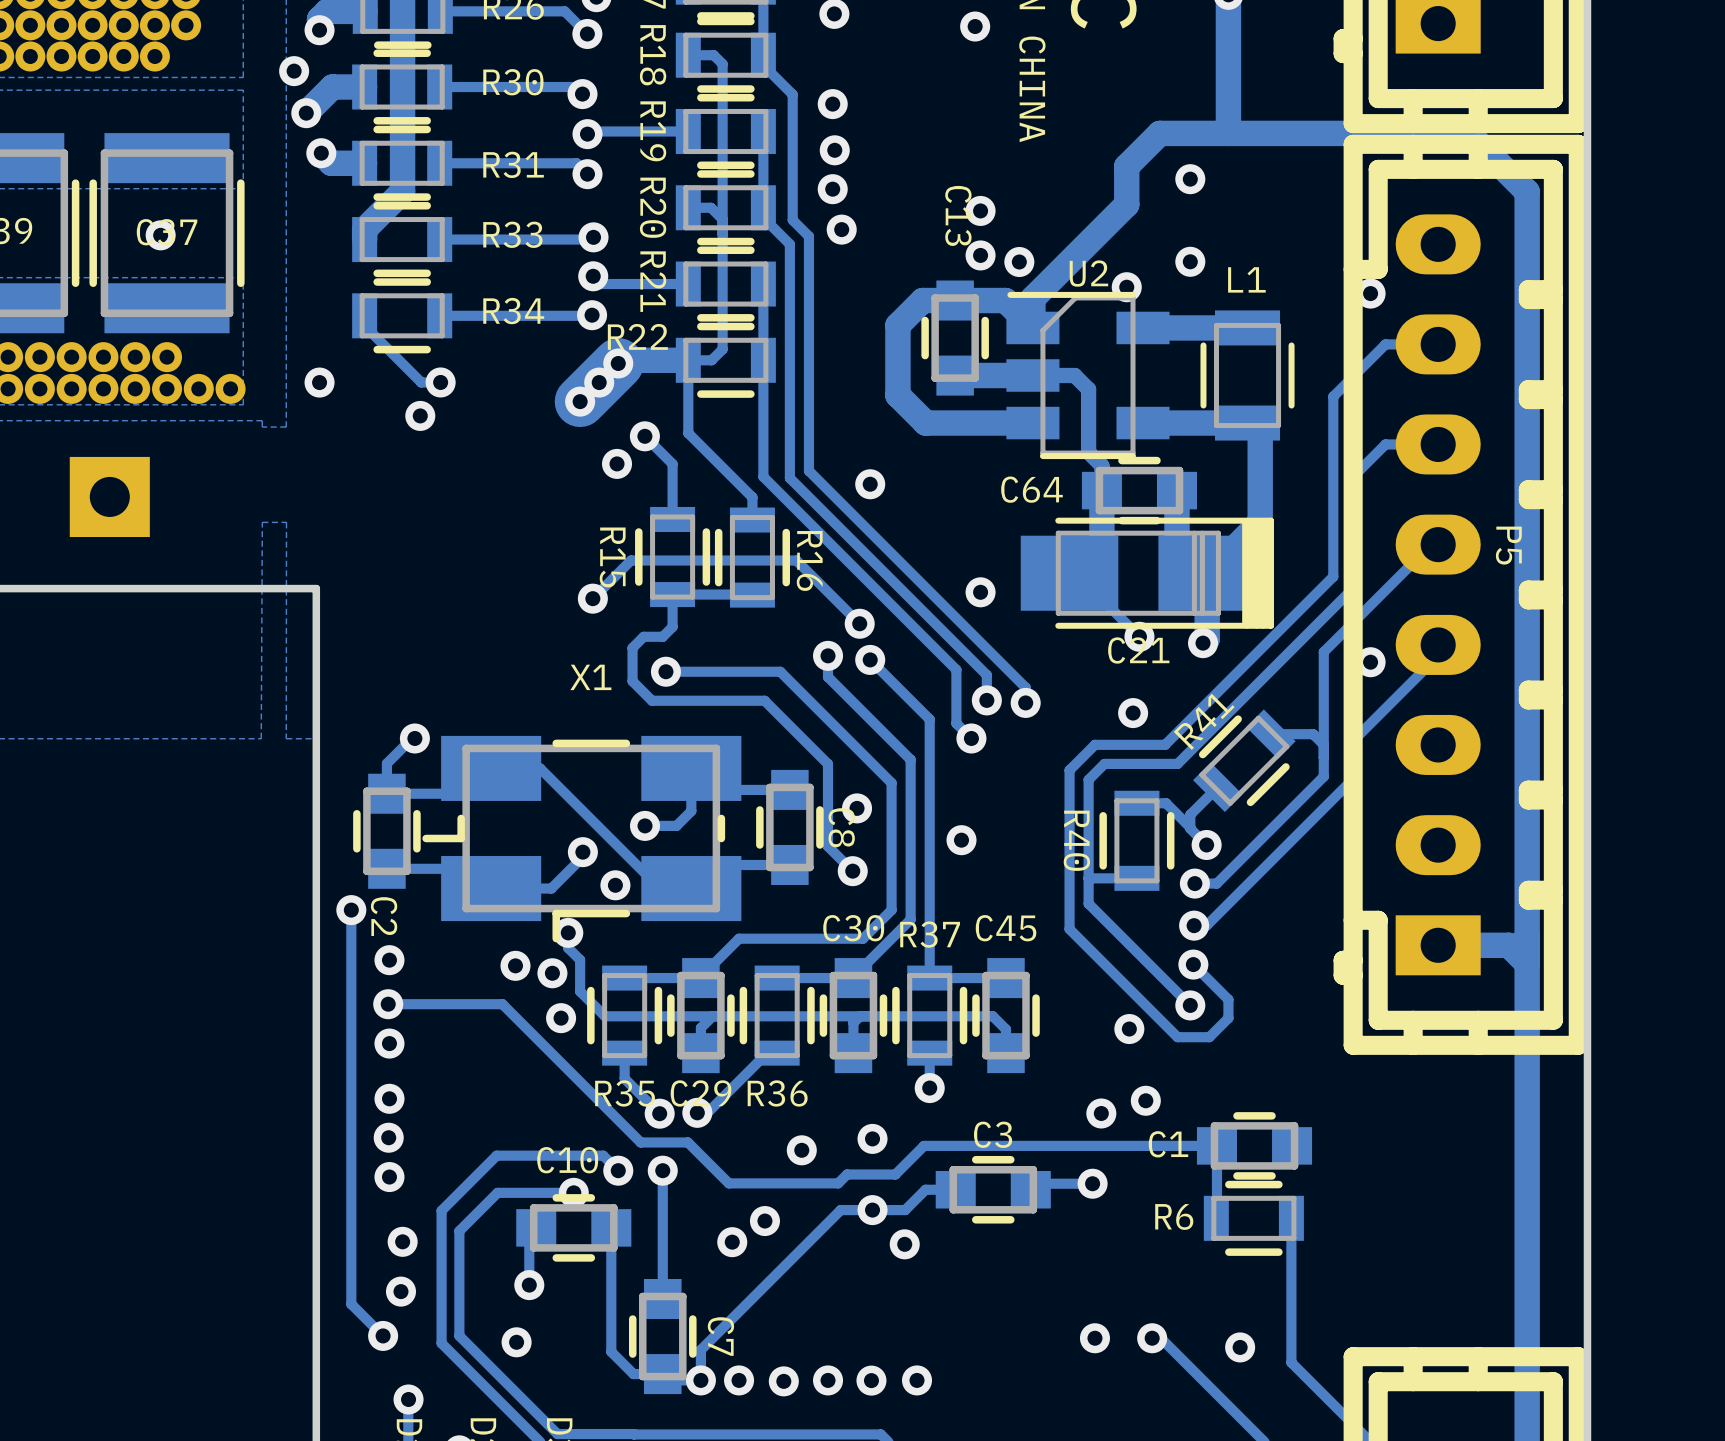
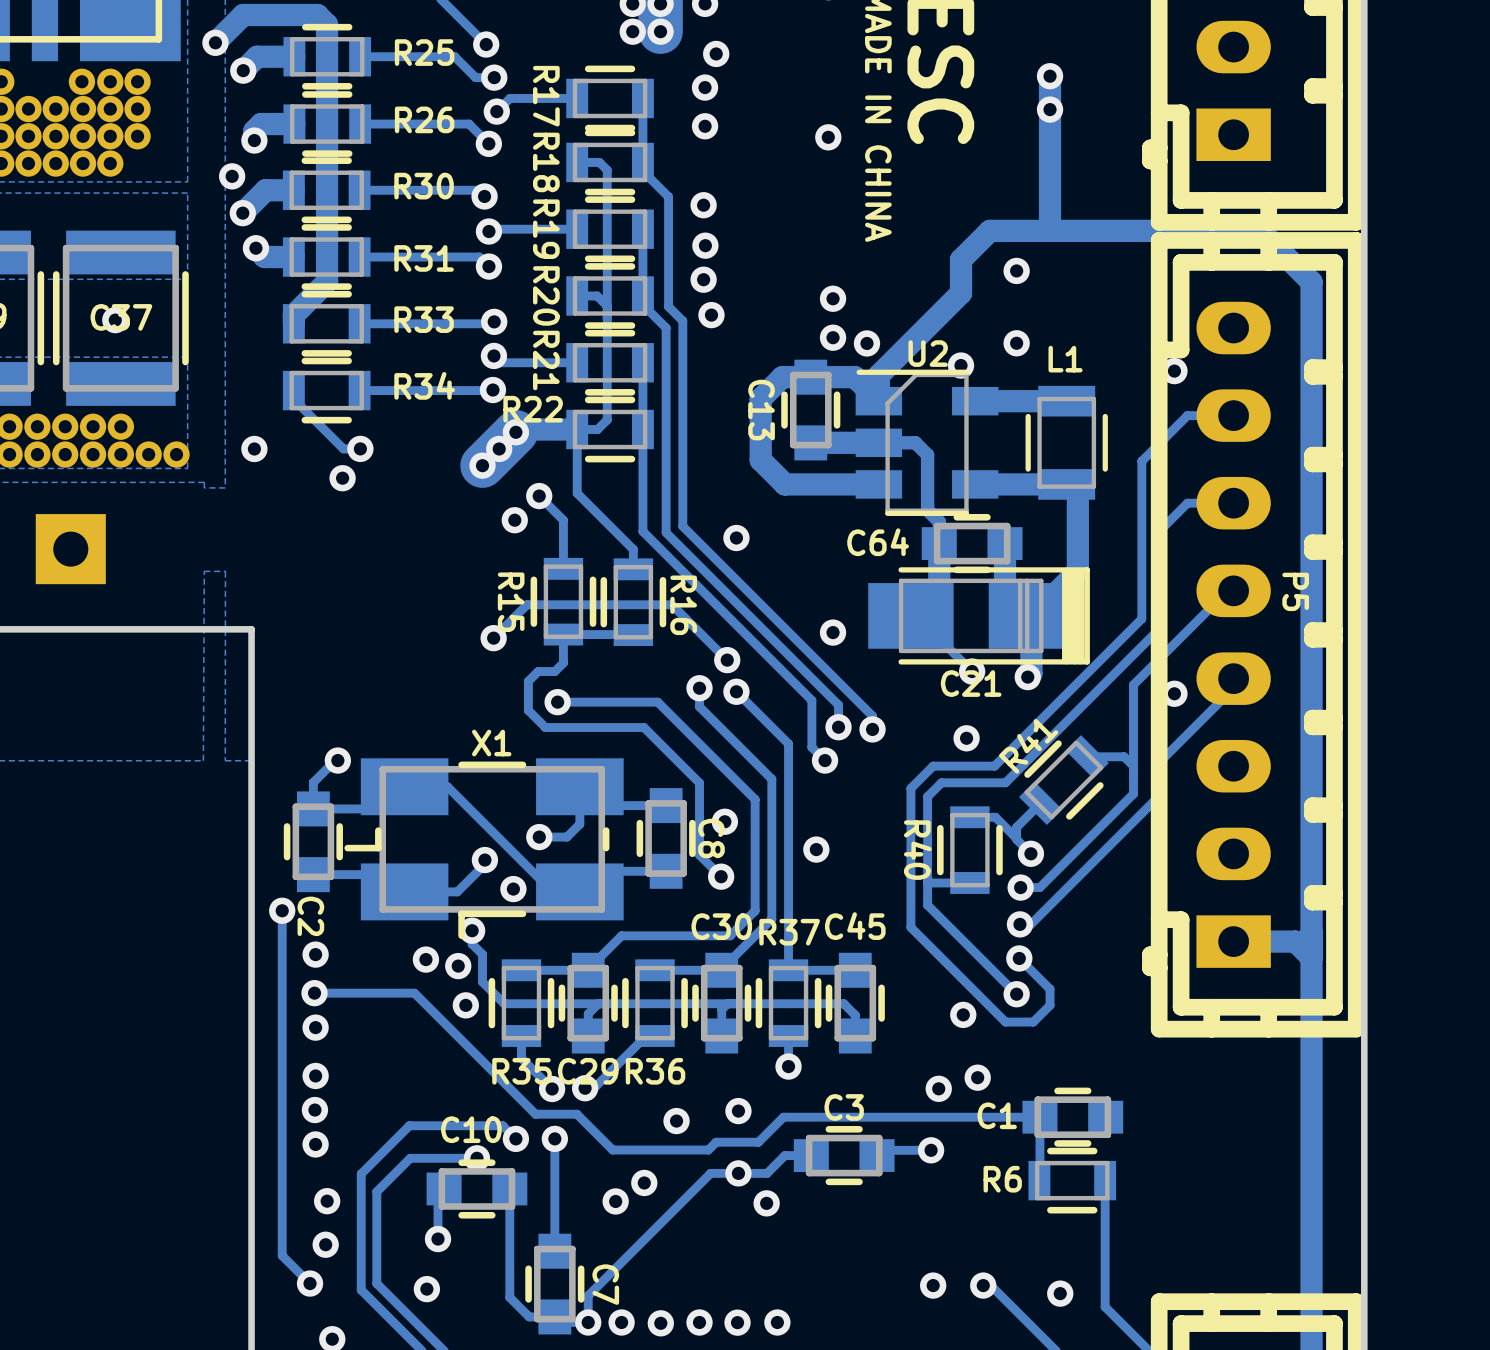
C13 name position: C13 (958, 215) -> C13 (761, 410)
X1 name position: X1 (590, 677) -> X1 (491, 743)

